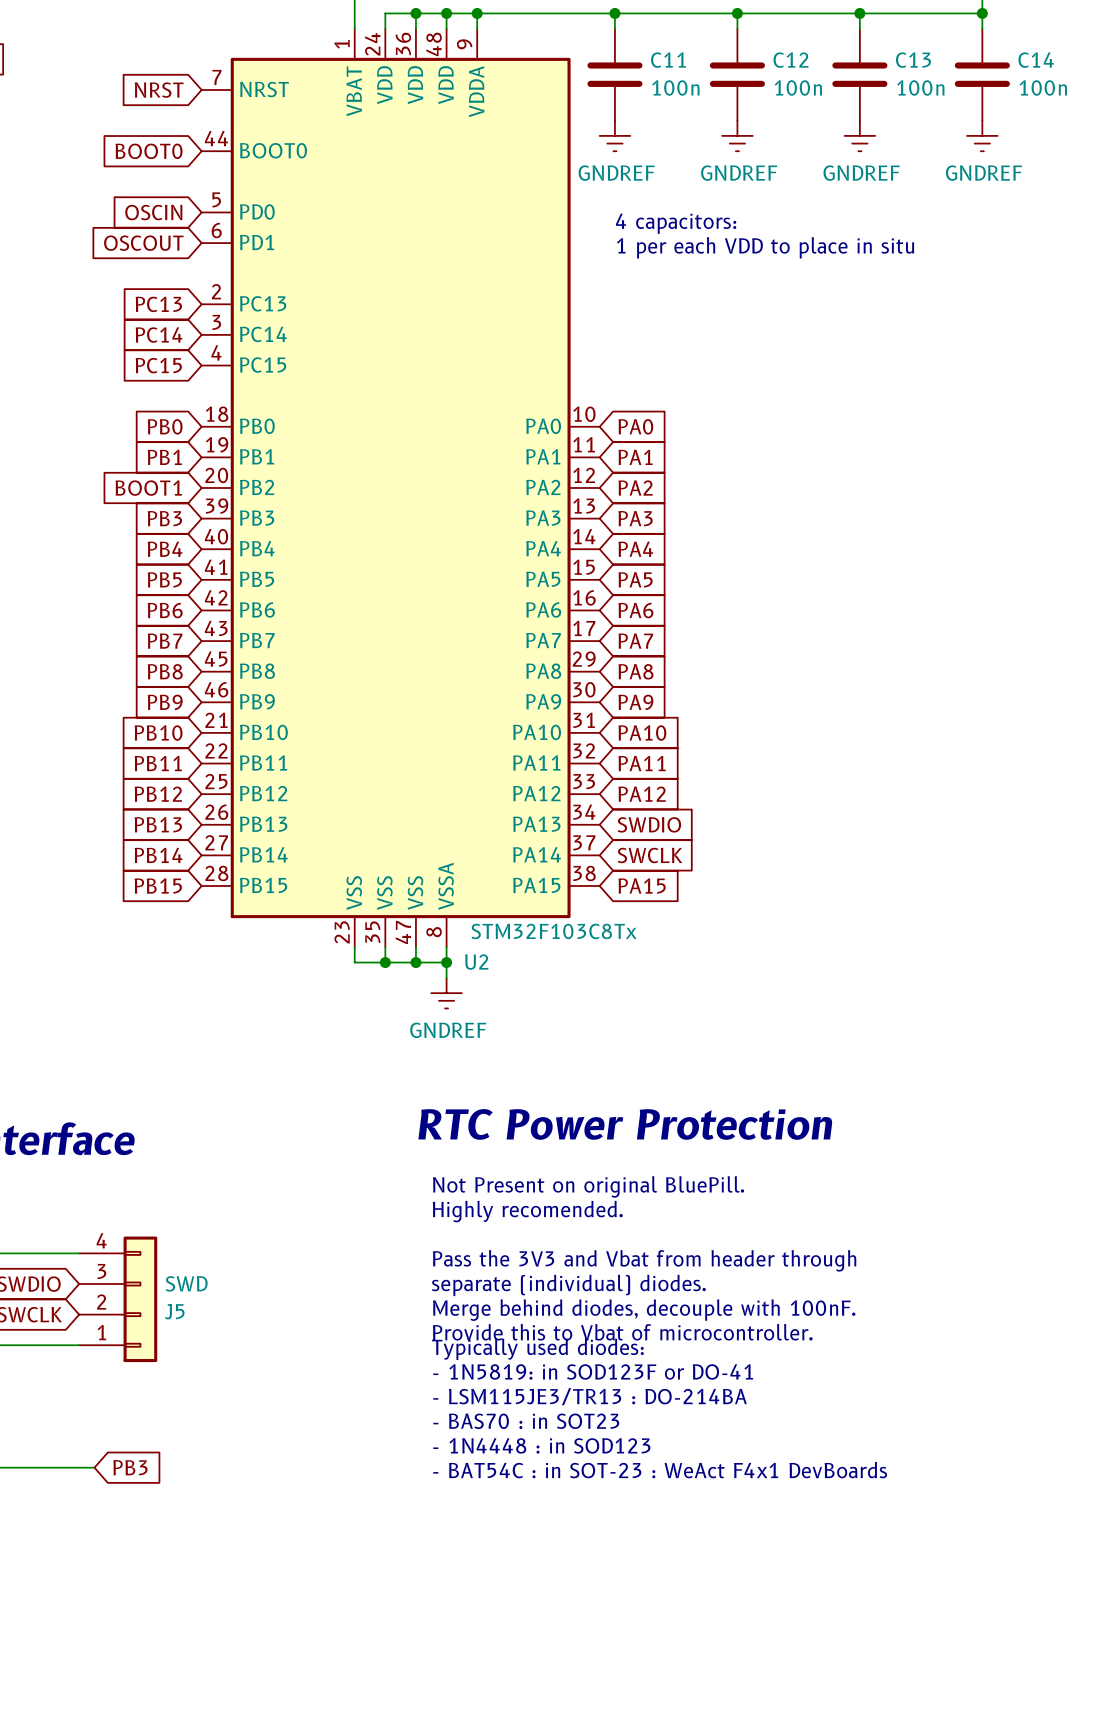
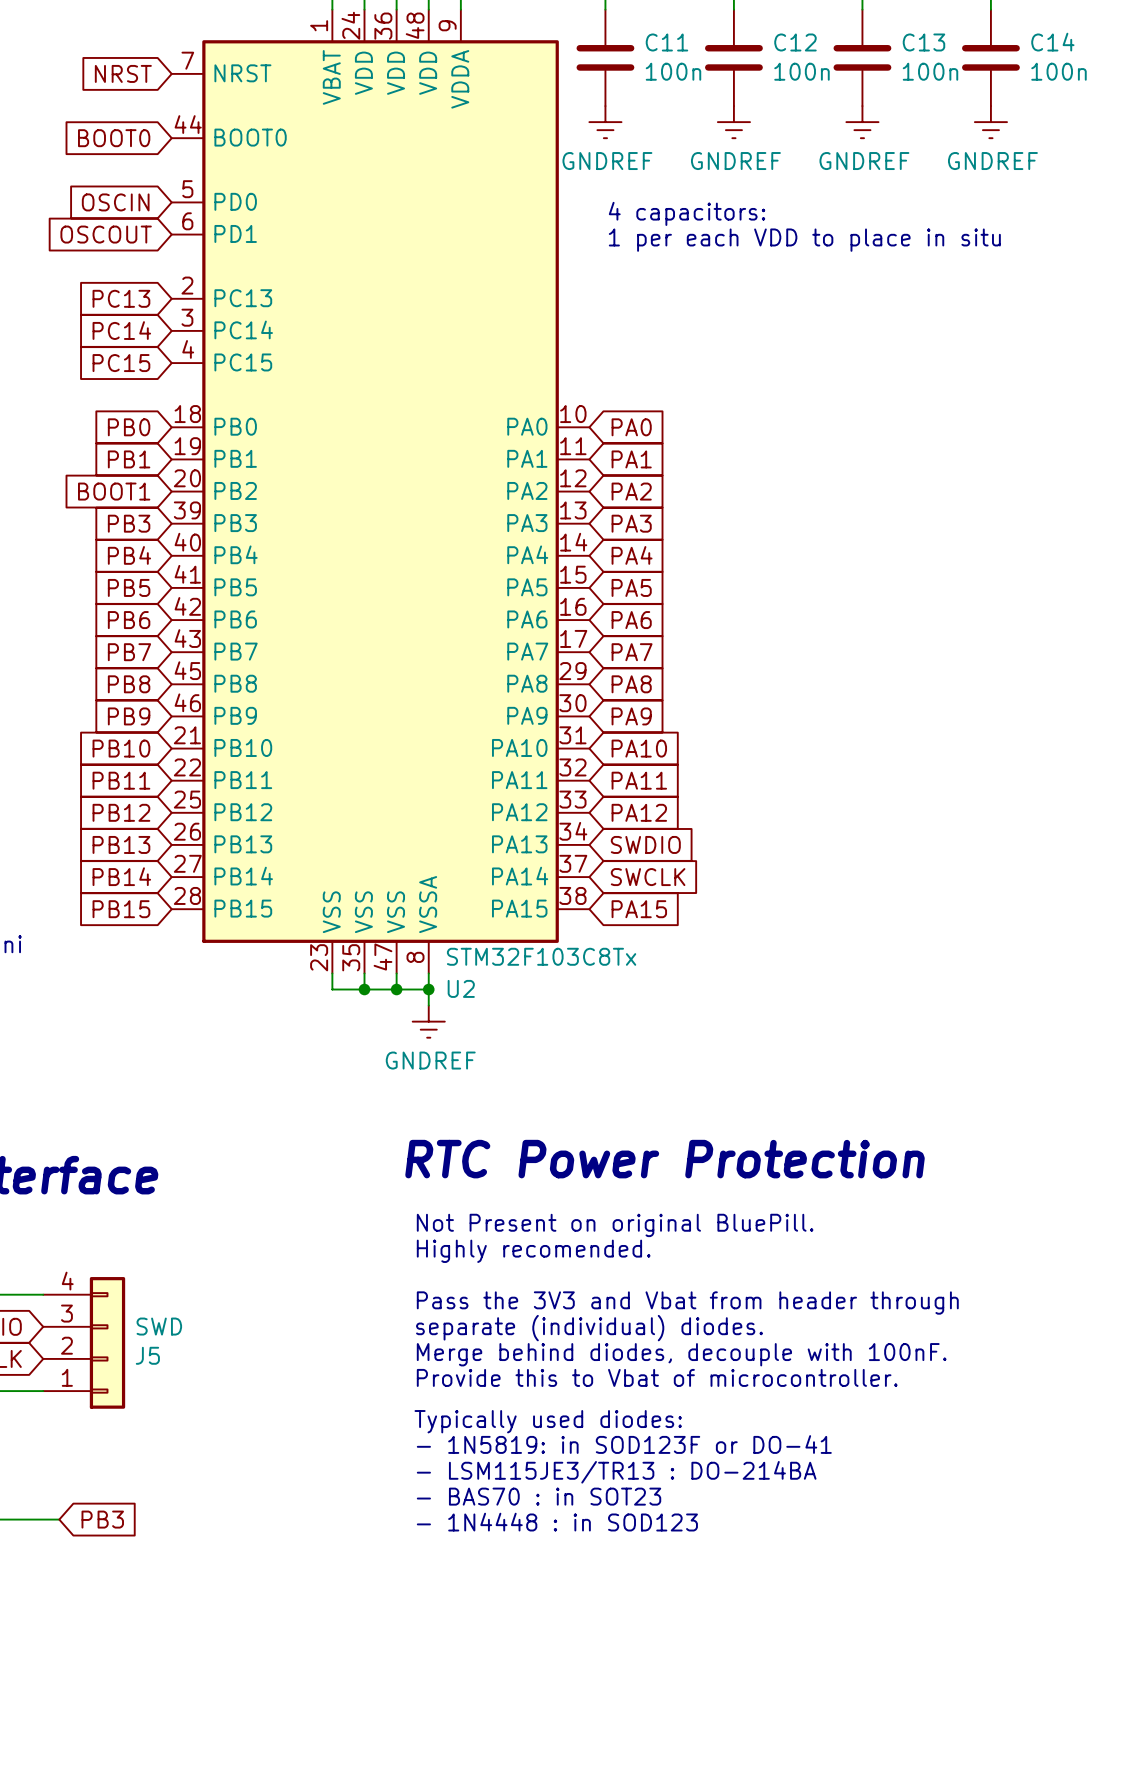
text: Typically used diodes: (537, 1349) -> none
text: - 1N5819: in SOD123F or DO-41 (593, 1371) -> Typically used diodes: (548, 1421)
text: - LSM115JE3/TR13 : DO-214BA (590, 1396) -> - 1N5819: in SOD123F or DO-41 (624, 1444)
text: - BAS70 : in SOT23 (526, 1421) -> - LSM115JE3/TR13 : DO-214BA (616, 1472)
text: - 1N4448 : in SOD123 (541, 1445) -> - BAS70 : in SOT23 (539, 1496)
text: - BAT54C : in SOT-23 : WeAct F4x1 DevBoards (660, 1470) -> - 1N4448 : in SOD123 (557, 1522)

